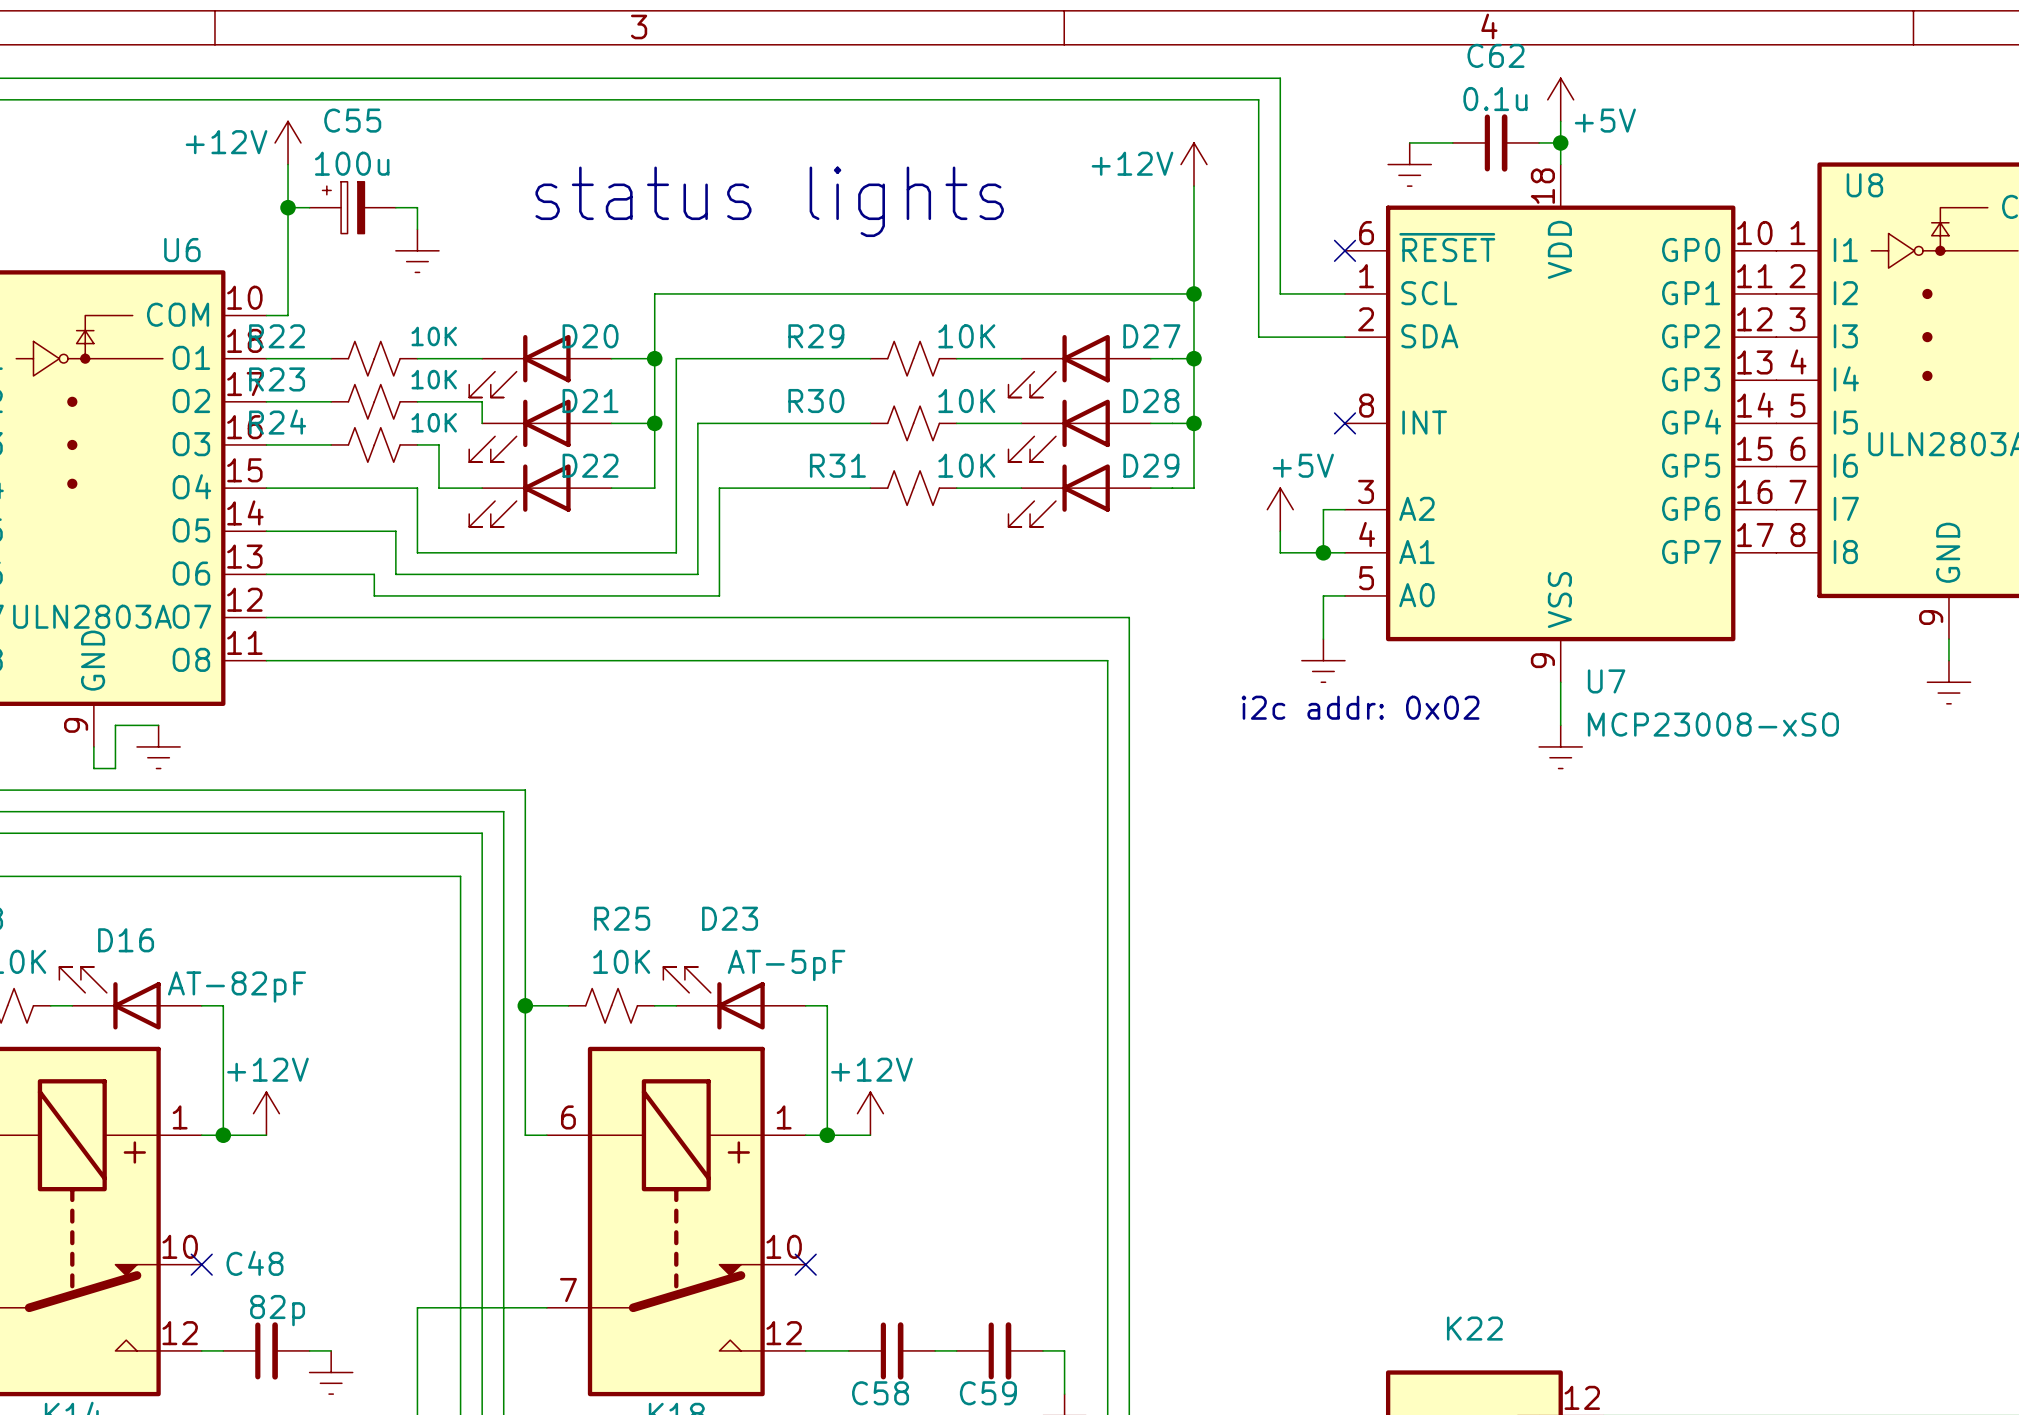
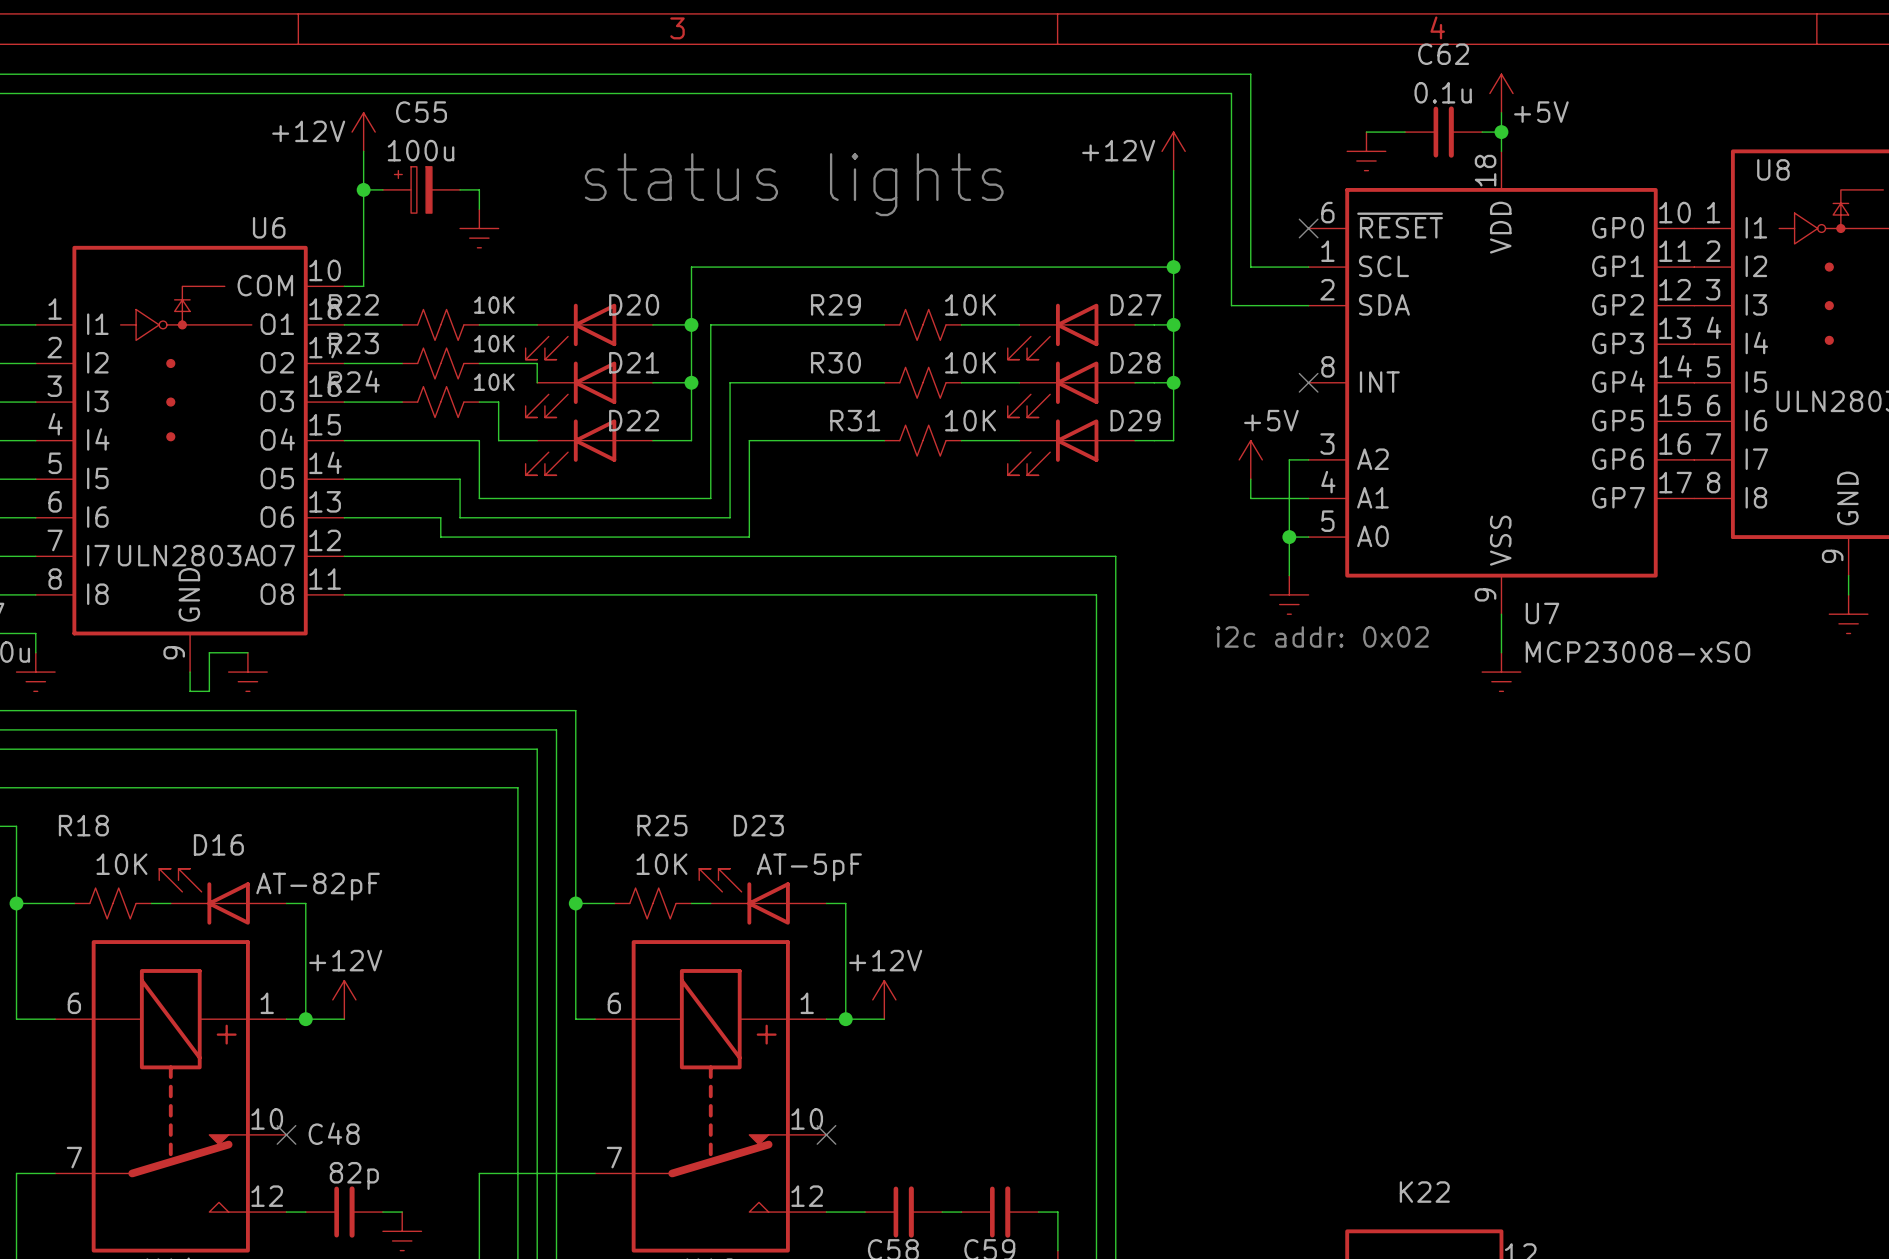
wire: none -> (1289, 498) (1289, 537)
junction position: (1323, 552) -> (1289, 537)

